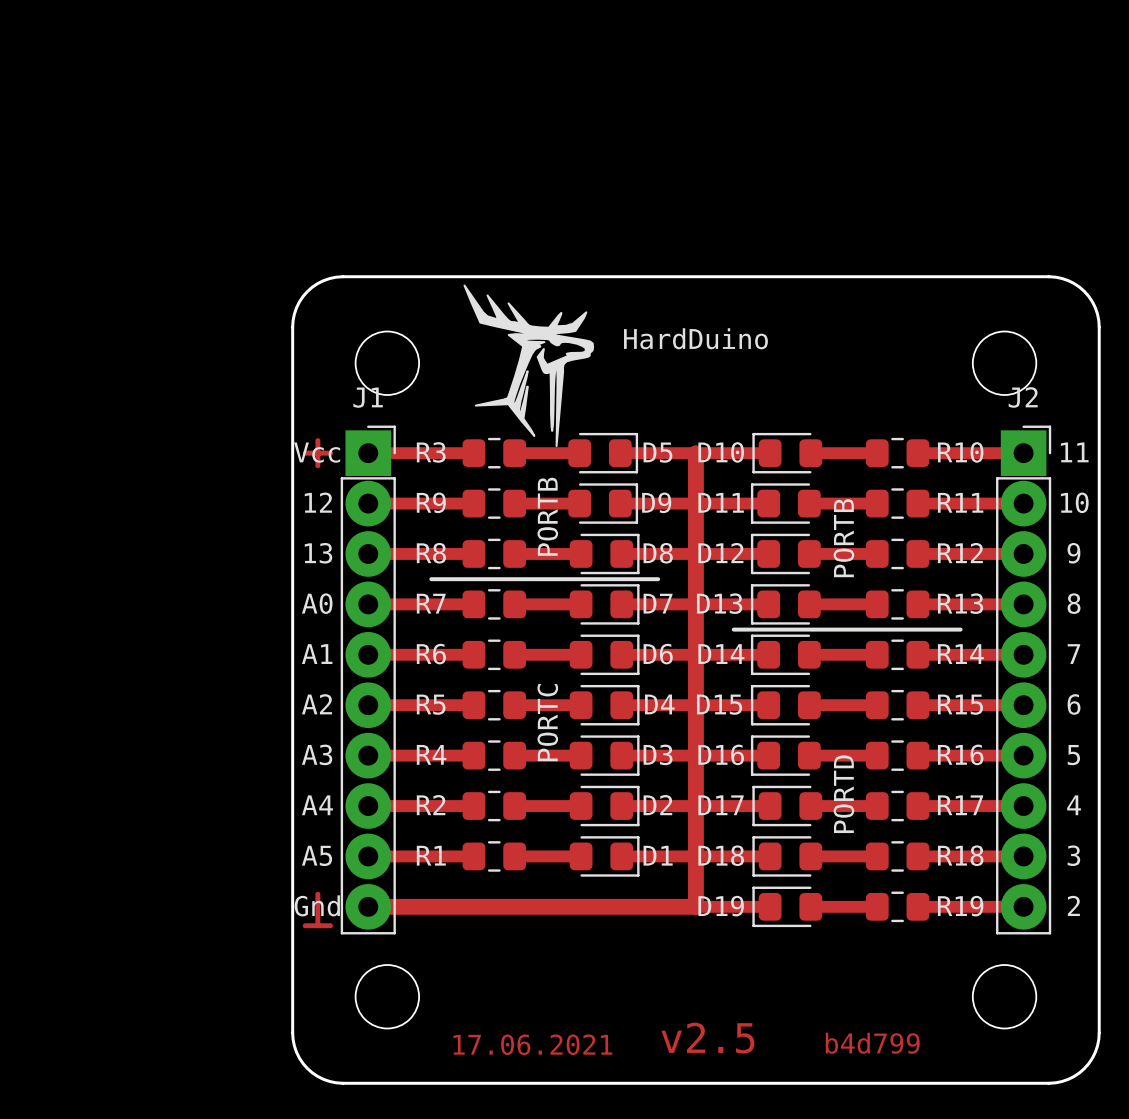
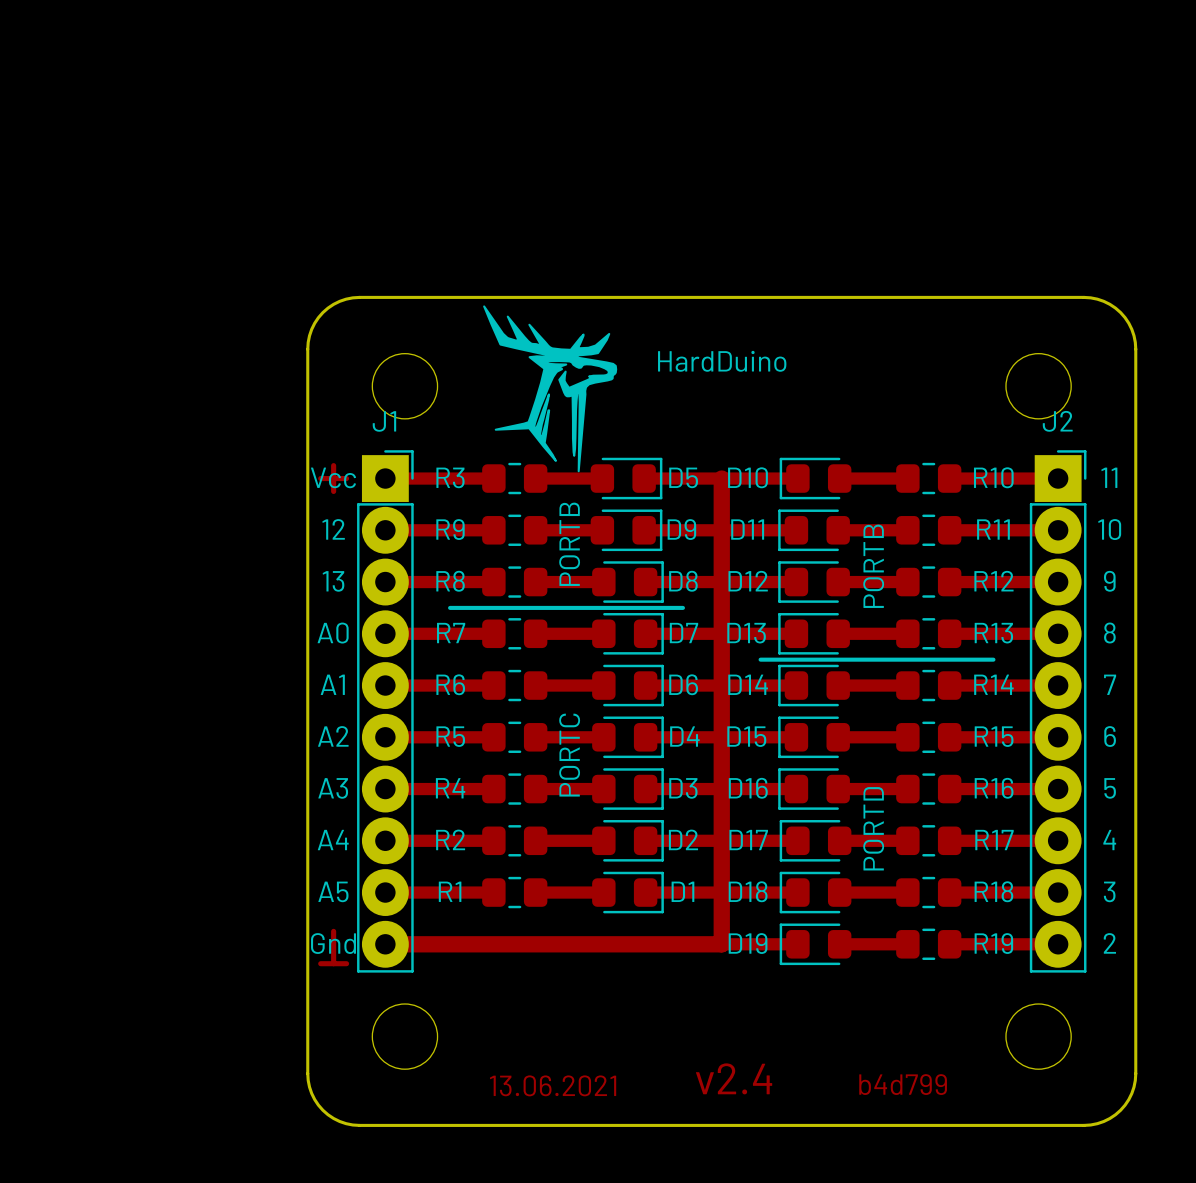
text: v2.5 (707, 1038) -> v2.4 (734, 1078)
text: 17.06.2021 (532, 1044) -> 13.06.2021 (553, 1085)

